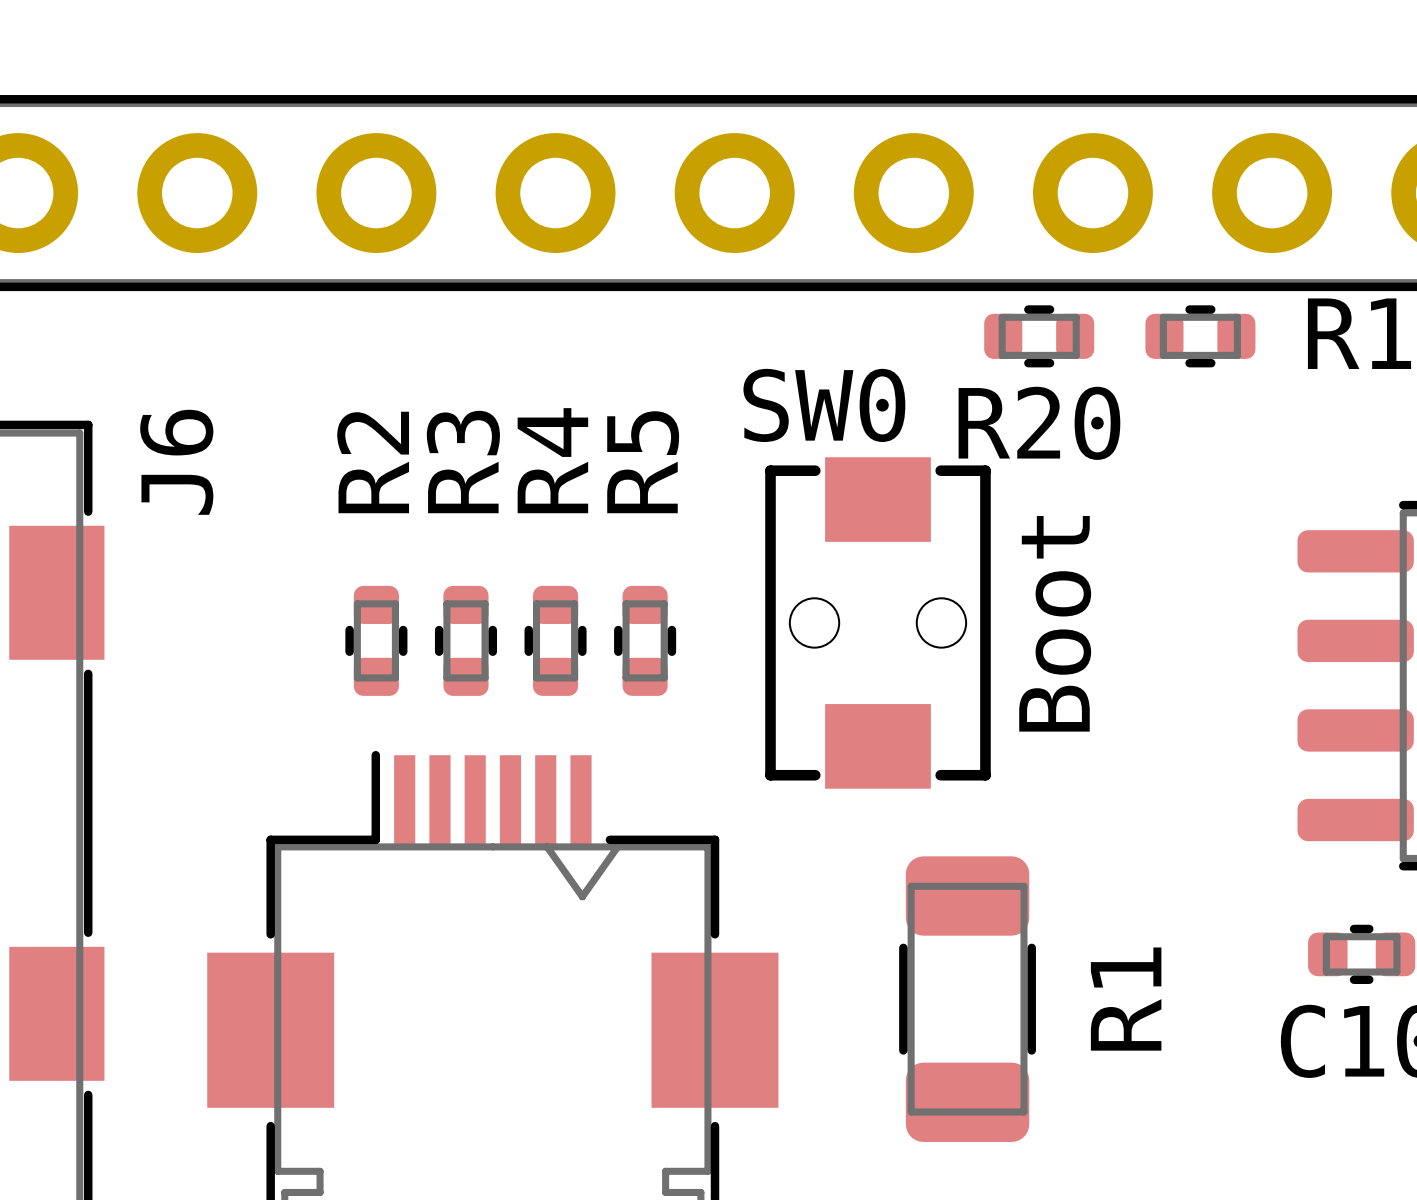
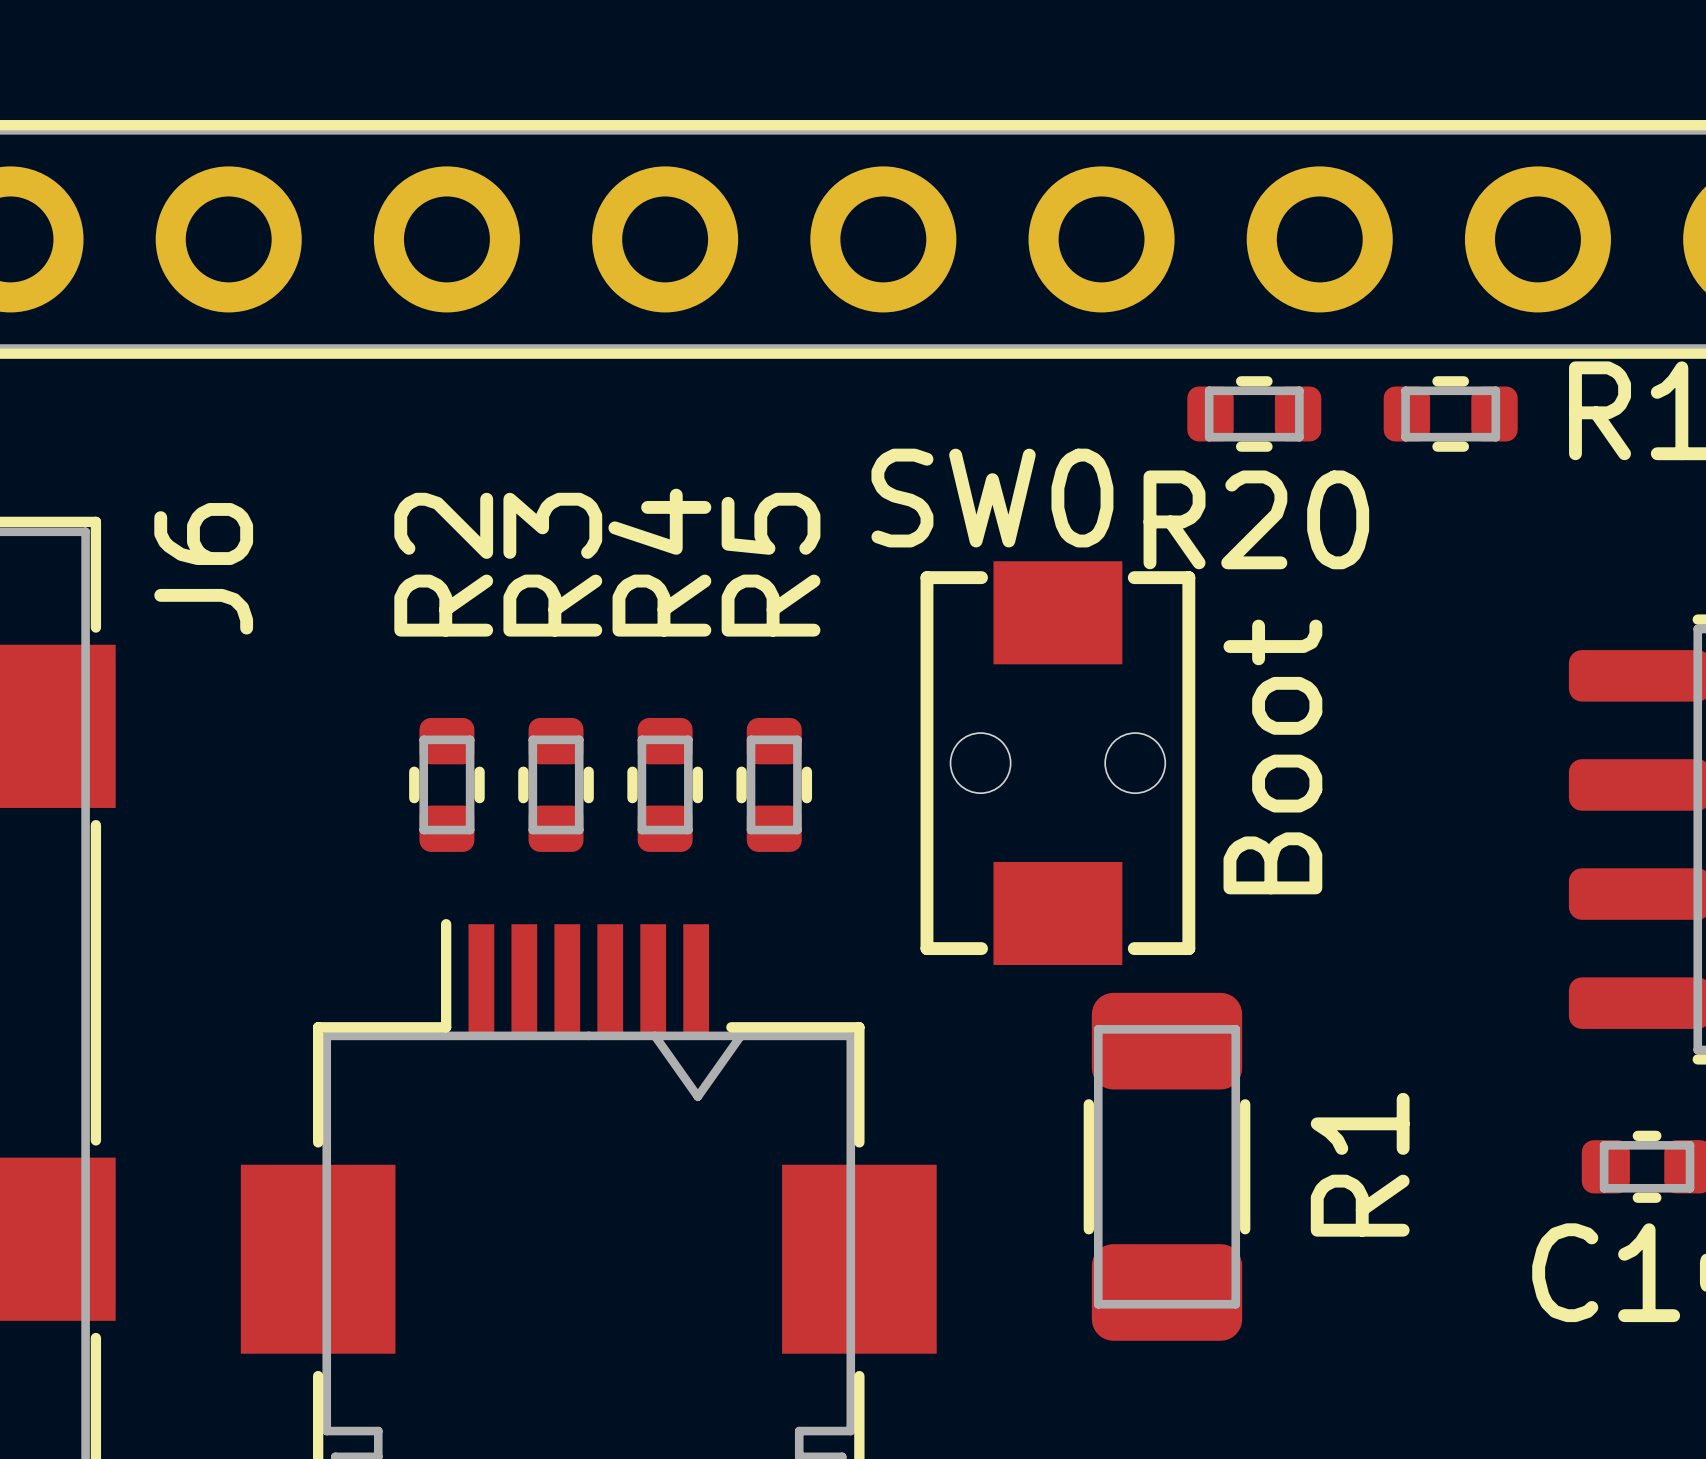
R1 position: (967, 999) -> (1167, 1166)

